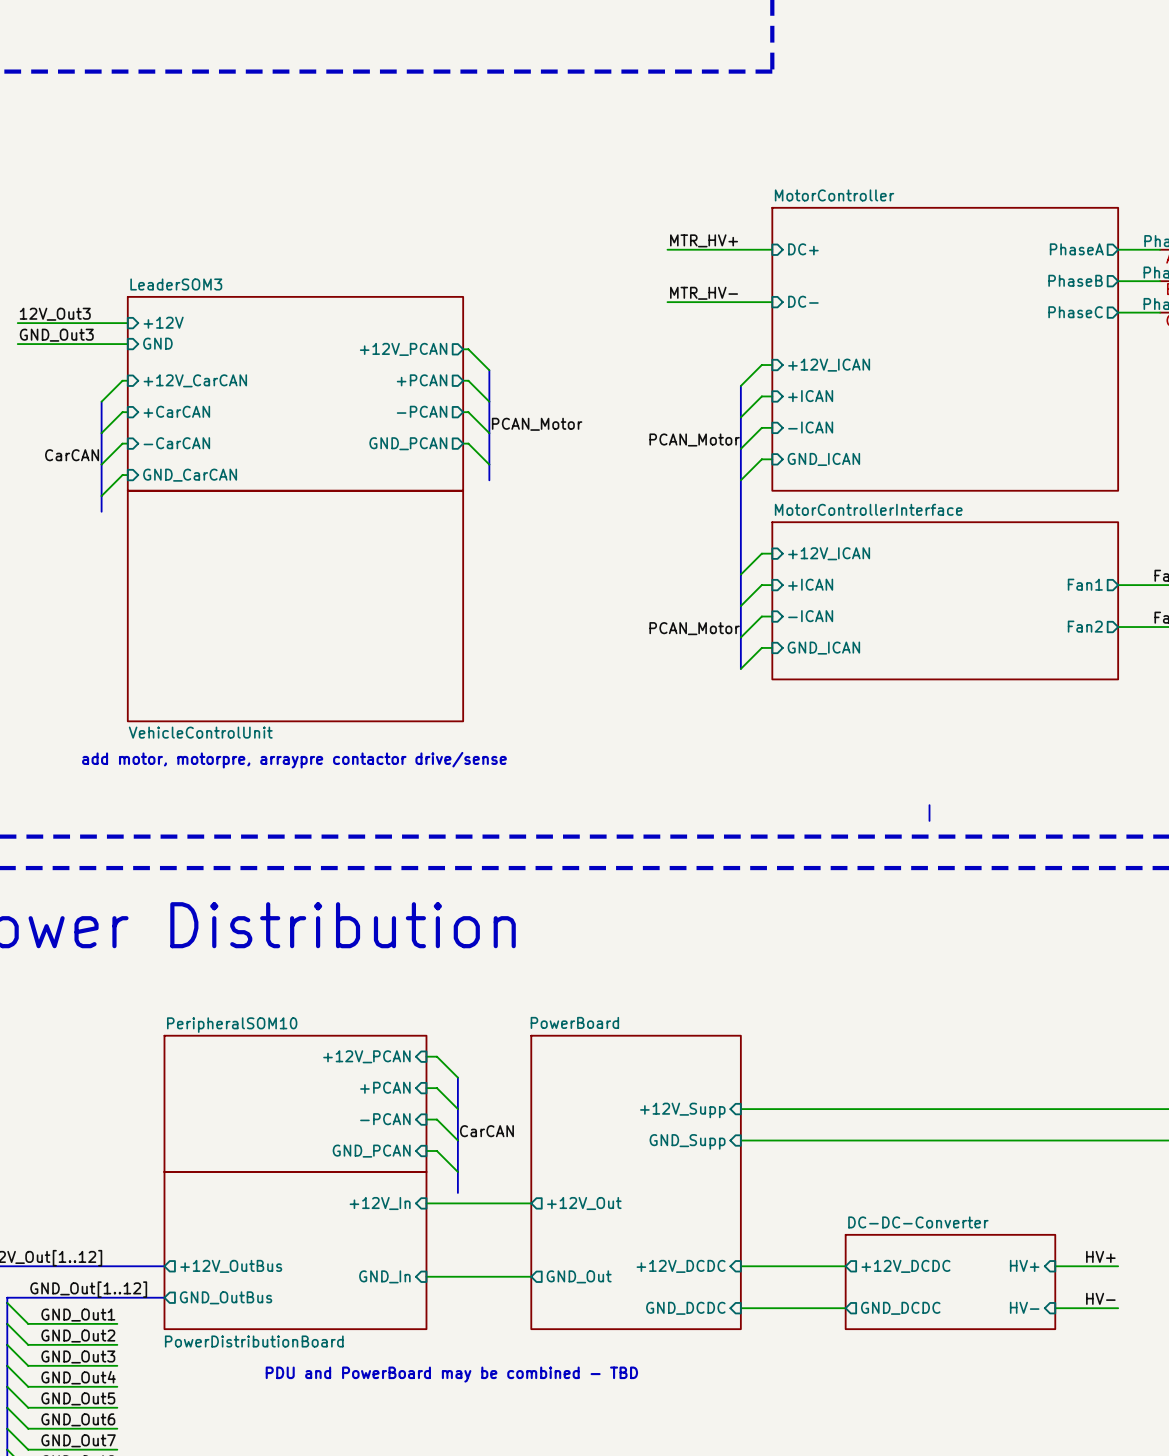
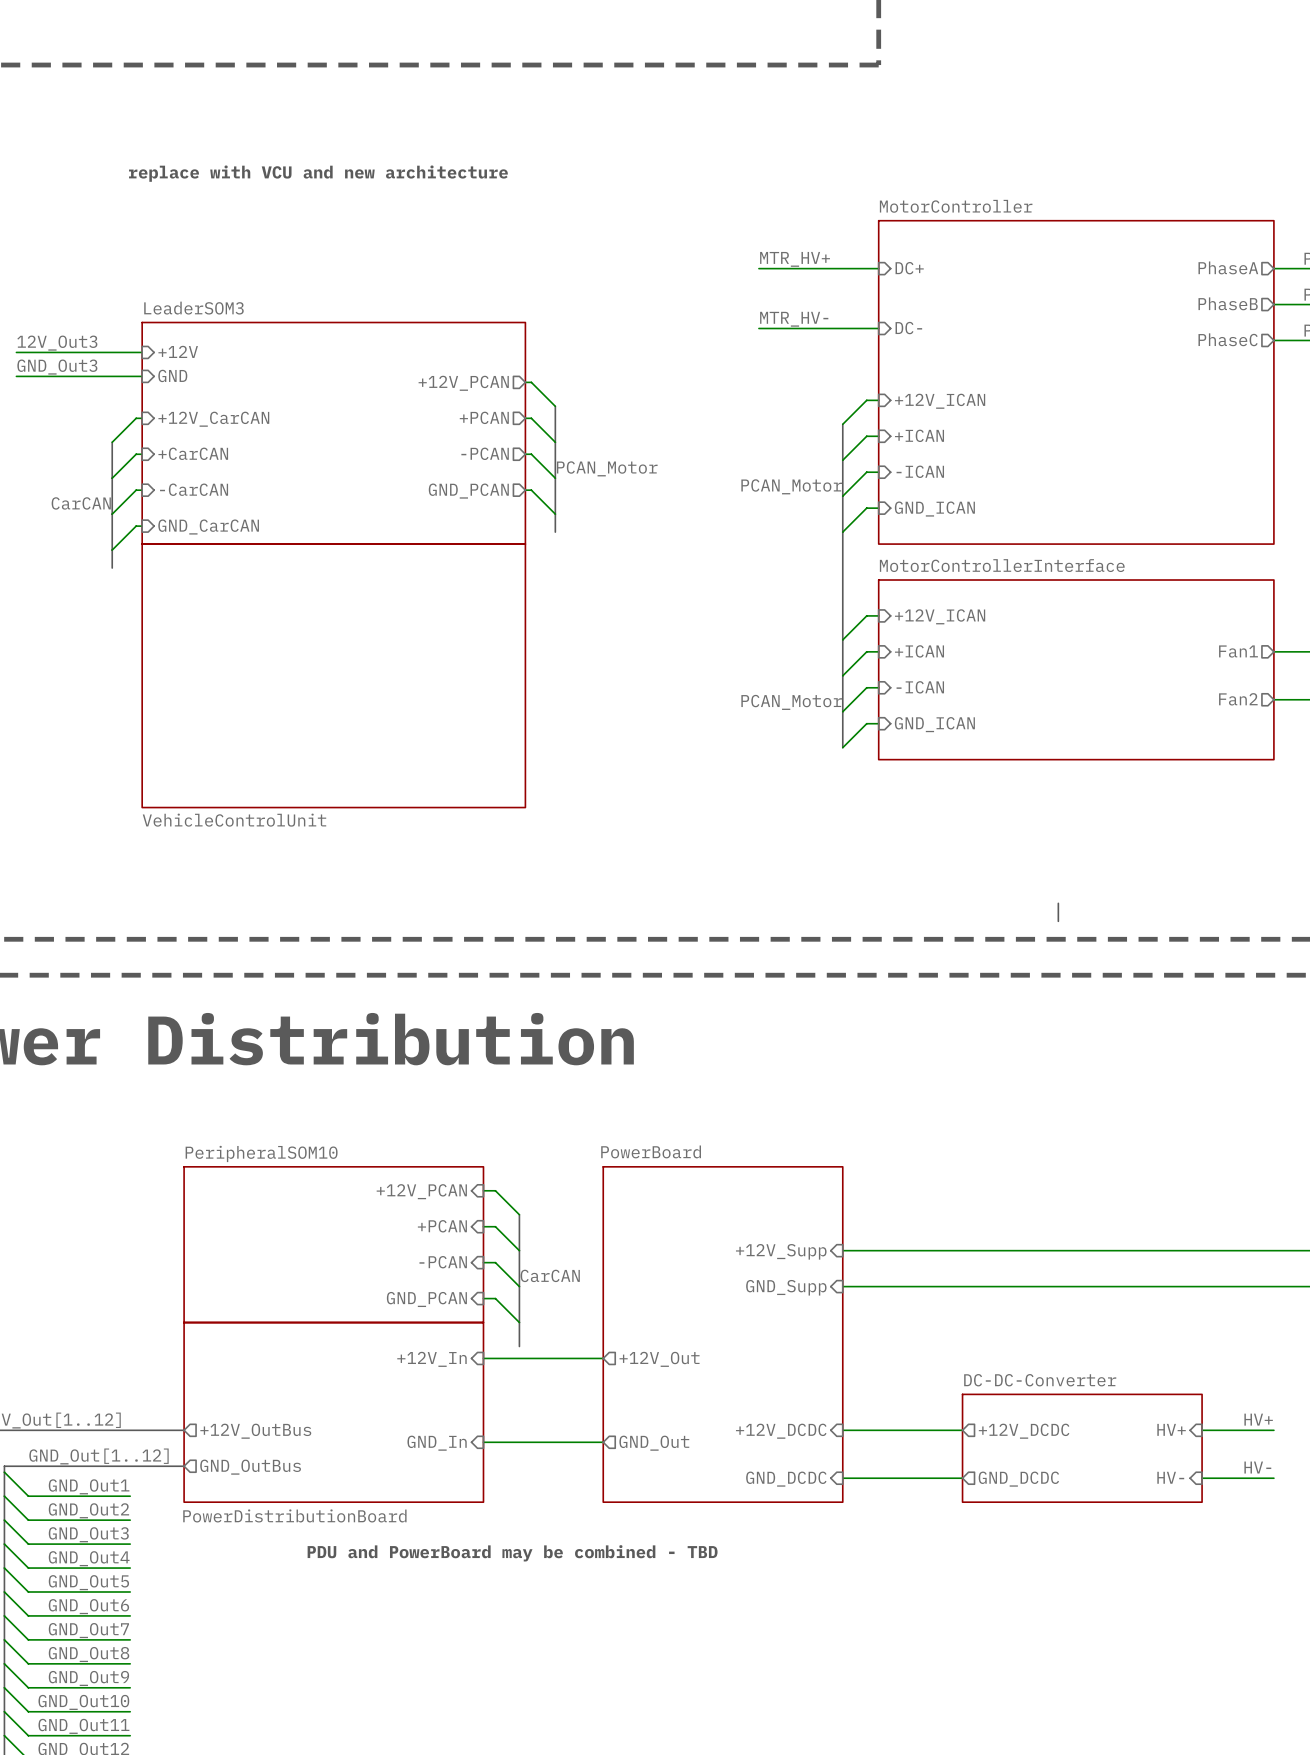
text: none -> replace with VCU and new architecture (318, 173)
text: add motor, motorpre, arraypre contactor drive/sense (294, 760) -> none

